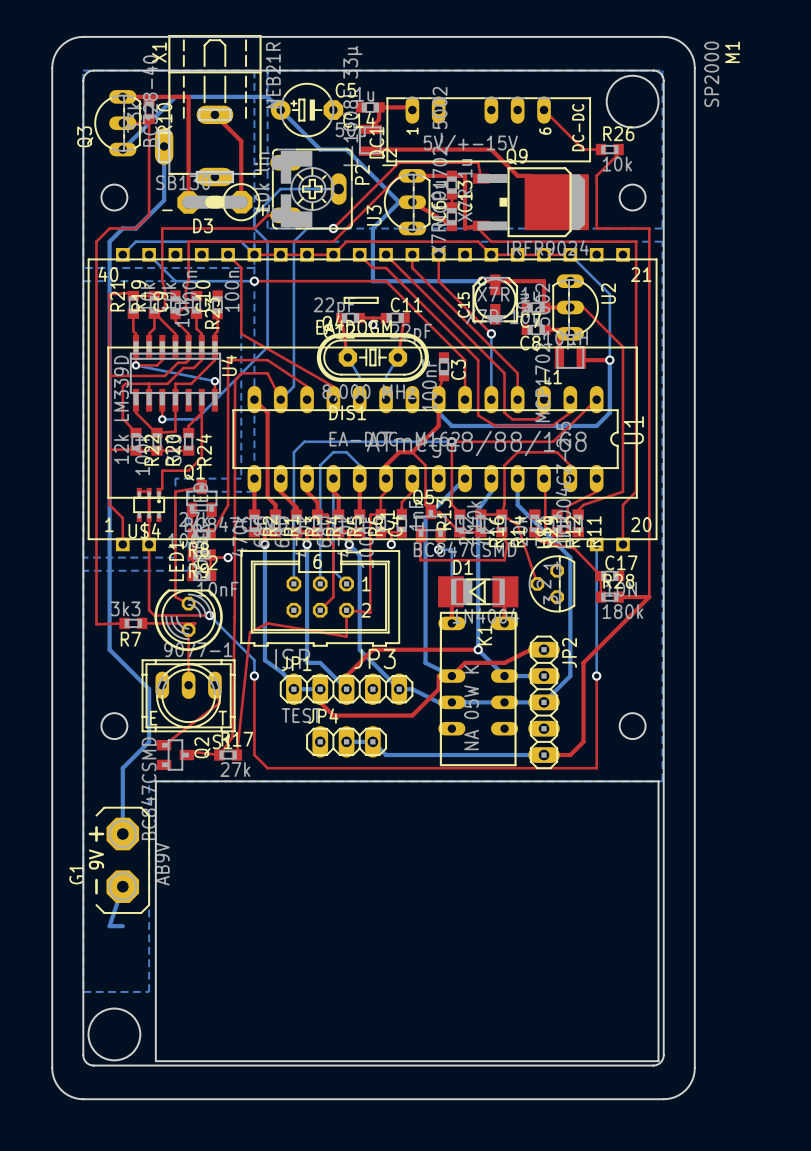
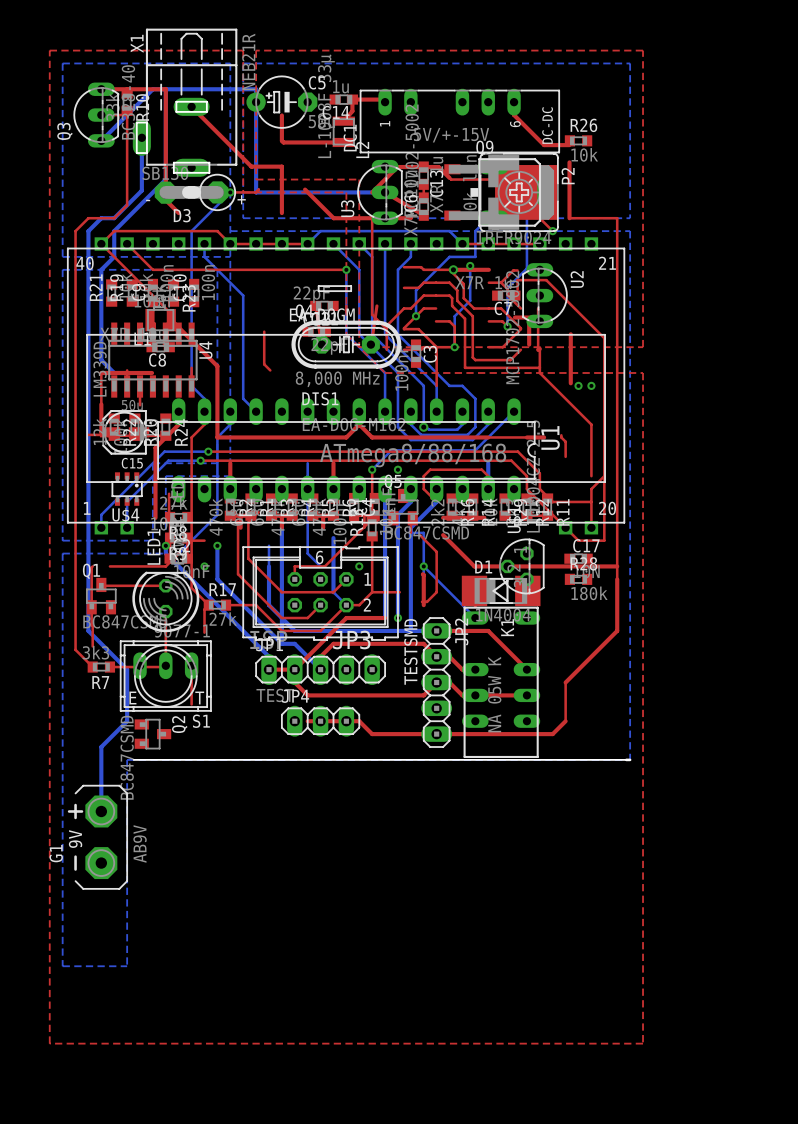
top zone outline: none -> (49, 50) (243, 50) (243, 192) (346, 192) (346, 334) (385, 372) (643, 372) (643, 1043) (49, 1043) (49, 50)
top zone outline: none -> (256, 50) (643, 50) (643, 347) (359, 347) (359, 179) (256, 179) (256, 50)
bottom track: none -> (165, 89) (165, 179) (114, 231) (114, 256) (101, 269) (101, 360) (114, 372) (127, 372)
bottom track: (267, 96) (320, 149) (346, 149) (399, 202) -> (243, 89) (256, 89) (256, 192) (372, 192)
top track: none -> (514, 99) (514, 115) (544, 145) (569, 145)
top track: (544, 110) (583, 149) (601, 149) -> none
top track: (241, 141) (241, 202) -> (217, 132) (251, 166) (281, 166) (281, 213)
top track: (618, 149) (618, 153) (596, 175) (596, 228) (600, 228) -> (569, 162) (569, 218)
top track: (370, 151) (370, 149) (491, 149) (517, 175) (530, 175) (530, 189) (556, 202) -> (343, 142) (283, 142) (281, 140) (281, 115)
top track: (481, 178) (478, 162) (399, 162) (333, 228) -> none
P2 position: (311, 189) -> (518, 192)
bottom track: (338, 189) (280, 189) (254, 215) (254, 228) (267, 241) (267, 307) -> (204, 244) (204, 256) (243, 295)
top track: none -> (258, 189) (255, 192) (230, 192)
top track: none -> (305, 189) (333, 218) (410, 217)
top track: none -> (165, 192) (165, 200) (178, 213)
bottom track: none -> (230, 192) (191, 231) (191, 385) (204, 398) (204, 411)
via: none -> (230, 192)
top track: none -> (372, 192) (397, 167) (438, 167) (451, 179) (501, 179) (552, 231)
bottom track: (399, 202) (372, 228) (372, 281) (482, 281) -> none
bottom track: none -> (545, 192) (545, 200) (526, 218) (526, 268) (507, 287) (507, 326)
top track: (286, 215) (267, 215) (254, 228) (162, 228) (162, 281) (164, 289) (164, 307) (156, 314) -> none
bottom track: (333, 228) (307, 228) (293, 241) (293, 386) (280, 399) -> none
via: (333, 228) -> none
top track: none -> (372, 218) (372, 314) (386, 329)
bottom track: none -> (493, 218) (488, 218) (475, 231) (475, 256) (449, 256) (416, 290) (416, 316)
top track: (188, 241) (188, 281) (185, 287) (185, 307) (175, 313) (175, 320) (188, 333) (188, 360) (185, 362) (178, 362) (164, 375) (109, 375) -> (165, 231) (114, 231) (101, 244) (171, 314) (171, 320) (217, 366) (217, 437) (346, 437) (359, 424) (372, 437)
top track: (241, 241) (333, 241) (399, 175) (465, 175) (465, 228) (475, 225) (481, 225) (475, 225) (491, 241) (636, 241) (636, 350) -> (517, 289) (517, 280) (546, 280) (604, 338)
top track: none -> (217, 231) (230, 244)
via: none -> (552, 231)
bottom track: (122, 254) (135, 241) (241, 241) (254, 254) -> none
top track: none -> (127, 244) (152, 269) (230, 269)
bottom track: (149, 254) (175, 281) (254, 281) -> none
top track: (228, 254) (241, 268) (241, 333) (333, 386) (333, 399) -> none
top track: (333, 254) (346, 241) (478, 241) (491, 254) -> none
bottom track: none -> (307, 244) (320, 231) (449, 231) (462, 244)
top track: (359, 254) (372, 268) (386, 268) (478, 360) (478, 415) (495, 425) (551, 425) (570, 412) (570, 399) -> none
bottom track: none -> (333, 244) (359, 269) (359, 334) (397, 372) (397, 427) (410, 440) (472, 440) (488, 424) (488, 411)
top track: (386, 254) (501, 370) -> (404, 287) (418, 287) (423, 282) (449, 282) (457, 290) (457, 300) (472, 316) (472, 357)
bottom track: none -> (359, 244) (372, 256) (372, 334) (423, 385) (423, 424) (428, 429) (457, 429) (462, 424) (462, 411)
top track: (412, 254) (412, 268) (478, 333) -> (436, 321) (449, 321)
bottom track: none -> (385, 244) (385, 334) (436, 385) (436, 411)
top track: (438, 254) (438, 281) (491, 333) -> none
bottom track: none -> (410, 244) (410, 256) (397, 269) (397, 334) (449, 385) (462, 385) (475, 398) (475, 427) (467, 434) (421, 434) (410, 424) (410, 411)
bottom track: (570, 254) (609, 294) (609, 412) (596, 425) (451, 425) (438, 412) (438, 399) -> none
bottom track: none -> (470, 265) (470, 300) (454, 316) (454, 347)
via: none -> (470, 265)
top track: none -> (404, 267) (449, 269) (463, 284) (463, 298) (474, 308) (501, 308) (520, 328) (502, 347) (488, 347)
via: (254, 281) -> none
top track: (372, 281) (386, 281) (446, 341) -> (436, 308) (423, 308) (404, 328) (418, 329)
bottom track: none -> (346, 269) (346, 334) (385, 372) (385, 411)
via: none -> (346, 269)
top track: (518, 281) (544, 281) (544, 307) (583, 307) (622, 346) (622, 439) -> (538, 308) (539, 372) (591, 424)
top track: none -> (517, 270) (513, 270) (501, 282)
top track: none -> (488, 282) (501, 282)
top track: none -> (501, 282) (507, 289) (507, 295) (520, 308)
top track: (154, 296) (133, 296) (128, 293) (109, 294) (109, 504) (122, 518) (122, 544) -> none
C15 rotation: 0° (495, 299) -> 90° counterclockwise (124, 432)
C15 position: (495, 299) -> (124, 432)
top track: (154, 313) (154, 328) (149, 333) (149, 346) -> none
top track: (196, 313) (196, 328) (201, 333) (201, 360) (193, 368) (183, 368) (167, 383) (125, 383) (122, 386) -> (152, 372) (101, 372)
top track: (217, 313) (214, 360) (191, 383) (175, 383) (175, 431) (157, 432) (153, 430) (135, 412) (135, 400) -> none
top track: (135, 314) (133, 313) (133, 331) (135, 333) (135, 365) (157, 365) (162, 360) (162, 346) -> none
top track: (156, 314) (175, 333) (175, 346) -> none
top track: (359, 318) (386, 318) -> none
C11 position: (395, 318) -> (316, 331)
via: (372, 324) -> none
via: none -> (416, 316)
C8 position: (536, 329) -> (160, 347)
bottom track: (491, 333) (491, 399) -> none
via: (491, 333) -> none
top track: none -> (488, 321) (502, 321) (507, 326)
top track: (483, 339) (517, 373) (517, 399) -> (454, 326) (454, 347) (423, 347) (421, 349) (404, 349)
via: none -> (507, 326)
top track: none -> (264, 331) (264, 364) (270, 370)
bottom track: (267, 346) (196, 419) (162, 419) -> (243, 334) (243, 398) (256, 411)
top track: none -> (570, 334) (570, 383)
bottom track: (347, 357) (359, 377) -> none
bottom track: (397, 357) (386, 377) -> none
L1 position: (570, 357) -> (160, 320)
top track: (581, 357) (583, 360) (609, 360) -> none
via: none -> (454, 347)
via: (609, 360) -> none
top track: none -> (386, 349) (386, 325) (404, 308) (410, 308) (423, 295) (449, 295) (452, 298) (452, 305) (465, 318) (465, 367) (539, 367)
bottom track: (135, 365) (214, 381) -> none
via: (135, 365) -> none
top track: (504, 373) (504, 412) (512, 419) (536, 419) (544, 412) (544, 399) -> (475, 360) (510, 360) (520, 349)
top track: (443, 375) (438, 390) (438, 425) (412, 452) (425, 465) (425, 504) (430, 511) (439, 511) (459, 532) (480, 532) -> none
via: (214, 381) -> none
top track: (254, 399) (267, 412) (267, 497) (275, 504) (275, 514) -> none
top track: (280, 399) (267, 373) (241, 373) (235, 380) (232, 737) (219, 755) (189, 751) (186, 755) -> none
top track: (307, 399) (307, 386) (267, 360) (228, 360) (228, 425) -> none
top track: (596, 399) (553, 441) (451, 441) (451, 491) -> (488, 489) (488, 476) (481, 469) (430, 469) (423, 476)
via: none -> (578, 385)
via: none -> (591, 385)
top track: (201, 400) (201, 425) -> none
top track: (201, 412) (188, 425) (188, 432) -> none
top track: (122, 418) (135, 432) -> (101, 404) (101, 432) (110, 432)
via: (162, 419) -> none
bottom track: none -> (230, 411) (230, 424) (217, 437) (217, 514) (178, 553)
bottom track: none -> (514, 411) (475, 450) (391, 450) (372, 469)
top track: (201, 439) (201, 457) (188, 470) (162, 470) (162, 488) (158, 491) -> (178, 424) (155, 447) (155, 517)
top track: (228, 439) (228, 504) (210, 533) -> (204, 424) (191, 437) (191, 587) (208, 605) (204, 609) (204, 632)
U1 position: (425, 439) -> (346, 450)
bottom track: (451, 441) (304, 441) (293, 452) (293, 562) -> none
top track: none -> (561, 435) (565, 441) (565, 456)
top track: (399, 452) (386, 465) (386, 491) (380, 497) (380, 514) (370, 515) (370, 612) (346, 610) (346, 636) (267, 623) (250, 632) (236, 755) -> none
top track: (517, 452) (504, 465) (504, 504) (501, 514) -> (488, 437) (385, 437)
top track: (557, 452) (570, 465) (570, 478) -> (526, 437) (544, 437)
top track: none -> (208, 451) (517, 451) (539, 473) (539, 489) (552, 501) (591, 501)
bottom track: none -> (208, 451) (164, 451) (101, 514) (101, 527)
via: none -> (208, 451)
top track: none -> (200, 460) (511, 460) (514, 463)
bottom track: none -> (200, 460) (168, 460) (127, 501) (127, 527)
via: none -> (200, 460)
top track: (280, 478) (280, 491) (296, 507) (296, 514) -> none
top track: (307, 478) (307, 491) (317, 502) (317, 514) -> none
top track: (333, 478) (333, 491) (338, 497) (338, 514) -> none
bottom track: (359, 478) (359, 465) (346, 452) (333, 452) (320, 465) (320, 583) -> none
top track: (412, 478) (412, 491) (401, 502) (401, 514) -> none
bottom track: (465, 478) (425, 518) (425, 531) -> (410, 489) (410, 501) (397, 514)
bottom track: (491, 478) (491, 491) (478, 510) (478, 649) (504, 676) (544, 676) -> none
top track: (596, 478) (596, 491) (567, 506) (567, 532) -> none
top track: (545, 479) (545, 531) (534, 532) (541, 541) (574, 548) (601, 576) (601, 597) -> (515, 464) (526, 476) (526, 489) (578, 540) (604, 540) (604, 476)
top track: none -> (372, 469) (372, 519) (324, 566) (294, 566) (294, 579)
via: none -> (372, 469)
via: none -> (397, 469)
top track: (201, 486) (175, 491) (175, 597) (188, 603) -> (101, 584) (165, 585)
top track: (139, 491) (149, 491) (149, 610) (154, 615) (209, 615) -> none
top track: (622, 491) (583, 504) (578, 510) (578, 514) -> none
Q1 position: (201, 498) -> (101, 596)
bottom track: none -> (436, 489) (436, 501) (410, 527) (410, 630)
bottom track: (517, 504) (570, 557) (570, 676) (544, 702) (438, 702) (412, 689) (399, 689) (359, 649) (359, 610) -> (346, 605) (333, 592)
top track: (317, 514) (328, 515) (328, 539) (333, 544) (333, 597) (320, 610) -> none
top track: (480, 514) (501, 514) -> none
top track: (501, 514) (517, 524) (537, 583) -> none
R13 position: (459, 523) -> (372, 527)
top track: none -> (258, 512) (248, 522) (248, 558) (281, 592) (333, 592) (346, 579)
top track: none -> (230, 515) (227, 517) (233, 517) (238, 522) (238, 574) (281, 618) (307, 618) (320, 605)
top track: (501, 532) (507, 544) (504, 560) (420, 560) (420, 534) -> none
top track: none -> (443, 517) (484, 517)
bottom track: (264, 544) (264, 660) (283, 673) (293, 689) (320, 689) -> none
via: (264, 544) -> none
via: (307, 544) -> none
bottom track: (349, 544) (359, 554) -> none
via: (349, 544) -> none
via: (391, 544) -> none
bottom track: (596, 544) (596, 676) -> (385, 489) (385, 618)
via: (438, 549) -> none
top track: none -> (419, 535) (436, 551) (436, 592) (427, 601) (422, 601)
top track: none -> (443, 535) (474, 566) (617, 566)
top track: none -> (372, 536) (372, 592)
via: (228, 557) -> none
bottom track: none -> (165, 545) (165, 553) (269, 656) (269, 669)
via: none -> (165, 545)
bottom track: none -> (217, 545) (217, 579) (281, 643)
via: none -> (217, 545)
M1: SP2000 (373, 568) -> none
top track: none -> (178, 553) (165, 566) (109, 566)
top track: none -> (92, 566) (92, 646)
via: none -> (204, 566)
bottom track: none -> (269, 566) (269, 605) (294, 630) (436, 630)
via: none -> (359, 566)
bottom track: none -> (423, 566) (475, 618)
via: none -> (423, 566)
D1 position: (478, 591) -> (501, 590)
top track: (618, 597) (649, 597) (583, 662) (583, 741) (570, 755) -> (565, 721) (552, 734) (539, 734)
JP3 position: (320, 598) -> (320, 593)
top track: none -> (372, 592) (399, 592)
top track: none -> (372, 592) (359, 605) (346, 605) (320, 630) (281, 630) (256, 605) (226, 605)
bottom track: (209, 615) (254, 660) (254, 676) -> none
via: (209, 615) -> none
top track: (124, 623) (96, 624) -> (92, 667) (75, 649) (75, 606)
R7 position: (133, 623) -> (101, 667)
top track: (142, 623) (195, 623) (188, 629) -> none
top track: none -> (385, 618) (346, 618) (294, 669) (269, 669)
bottom track: (425, 636) (425, 662) (451, 676) -> none
via: none -> (397, 618)
top track: (465, 649) (372, 649) (359, 662) -> (475, 669) (462, 669) (449, 656) (436, 656) (423, 643) (333, 643)
top track: none -> (449, 630) (488, 630) (526, 669)
via: (478, 649) -> none
top track: (544, 649) (530, 649) (504, 662) (465, 662) (451, 676) (438, 676) (438, 689) (412, 715) -> (526, 695) (462, 695) (449, 682) (436, 682) (423, 695) (385, 695)
top track: none -> (194, 655) (191, 658) (191, 704)
top track: (254, 676) (254, 755) (267, 768) (596, 768) (596, 741) -> none
via: (254, 676) -> none
JP2 value: none -> TESTSMD (410, 651)
top track: (596, 676) (596, 702) -> (617, 579) (617, 630) (565, 682)
via: (596, 676) -> none
top track: (214, 685) (219, 703) (164, 745) -> none
top track: none -> (165, 667) (109, 667) (109, 669)
K1 position: (478, 689) -> (501, 682)
JP2 position: (544, 702) -> (436, 682)
top track: none -> (307, 721) (359, 721) (372, 734) (514, 734)
bottom track: (346, 741) (372, 741) (386, 755) (544, 755) -> none
R17 position: (228, 755) -> (217, 605)
board edge: (155, 781) (155, 1061) (658, 1061) (658, 781) -> (630, 759) (626, 759)
bottom track: (122, 886) (109, 926) (122, 926) -> none

